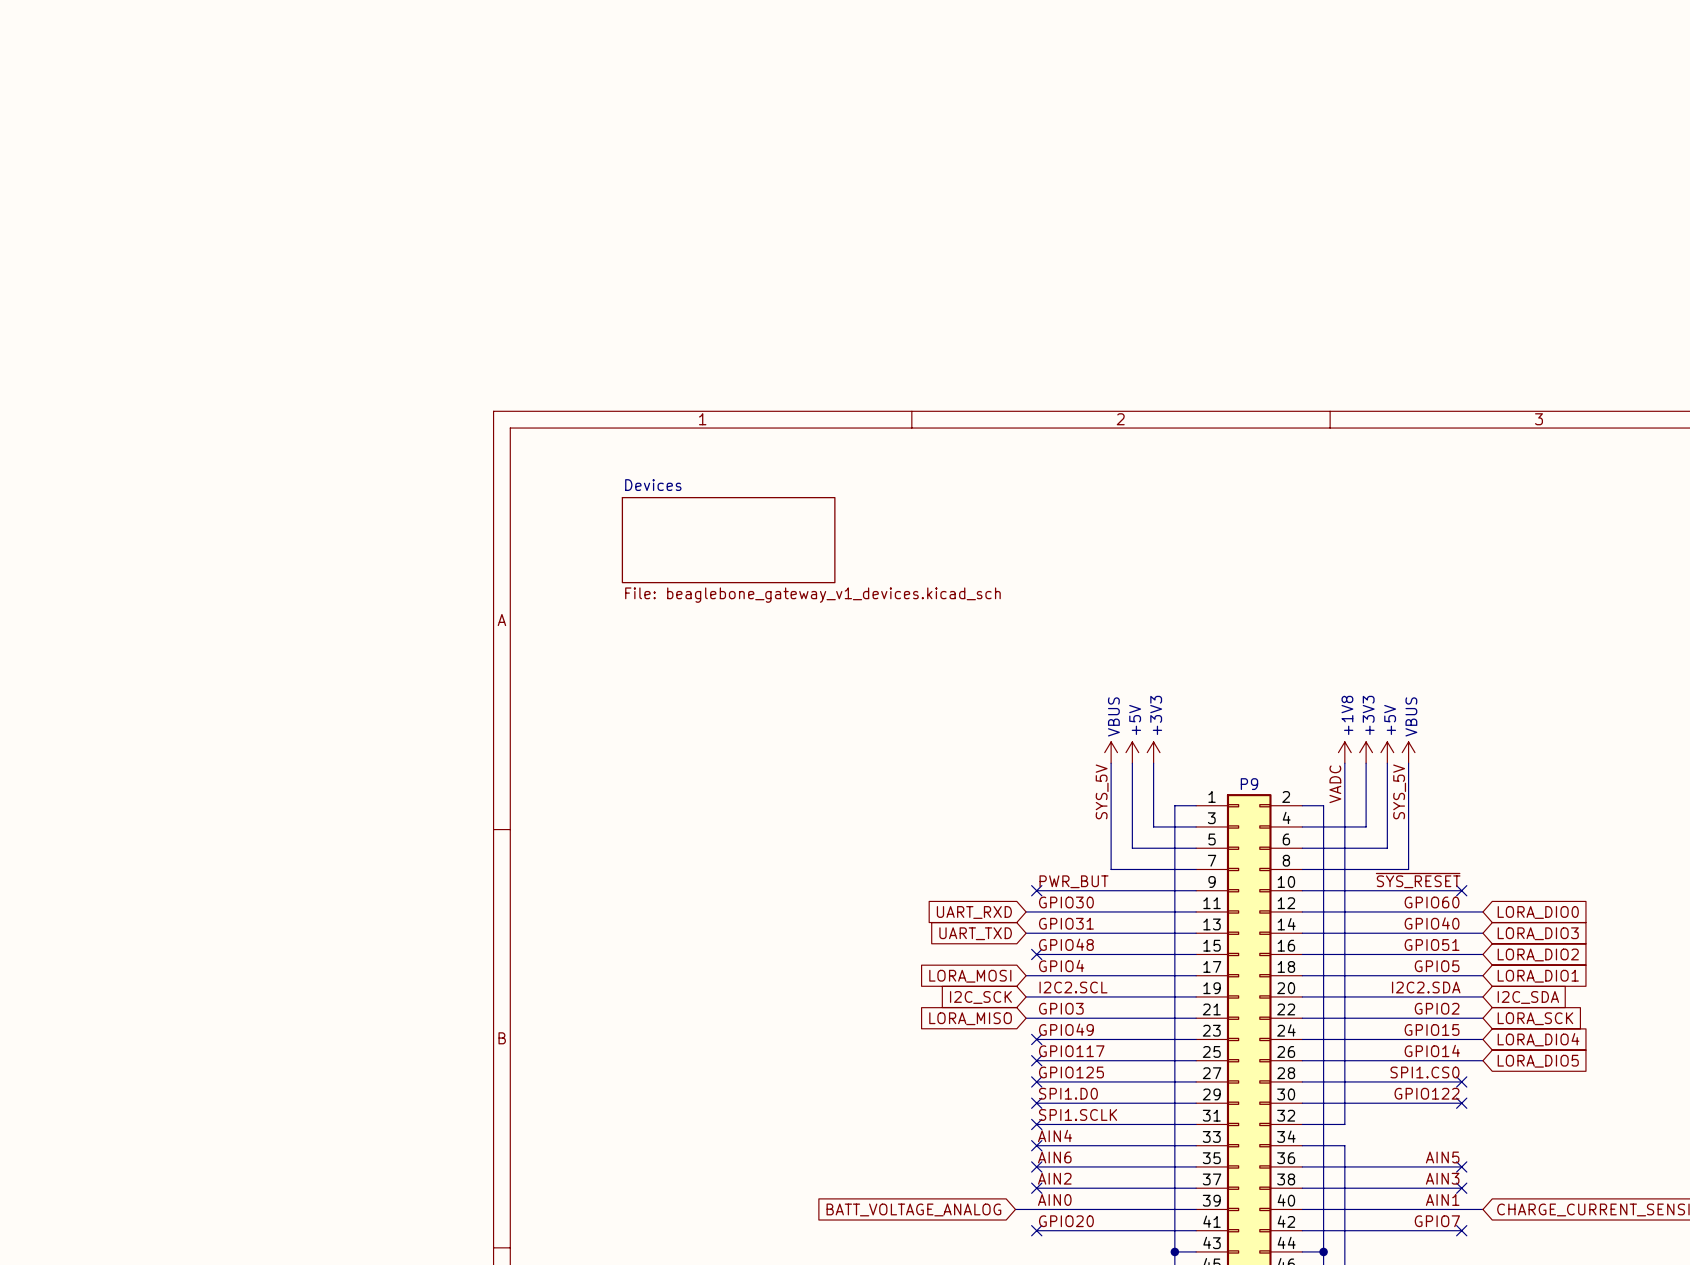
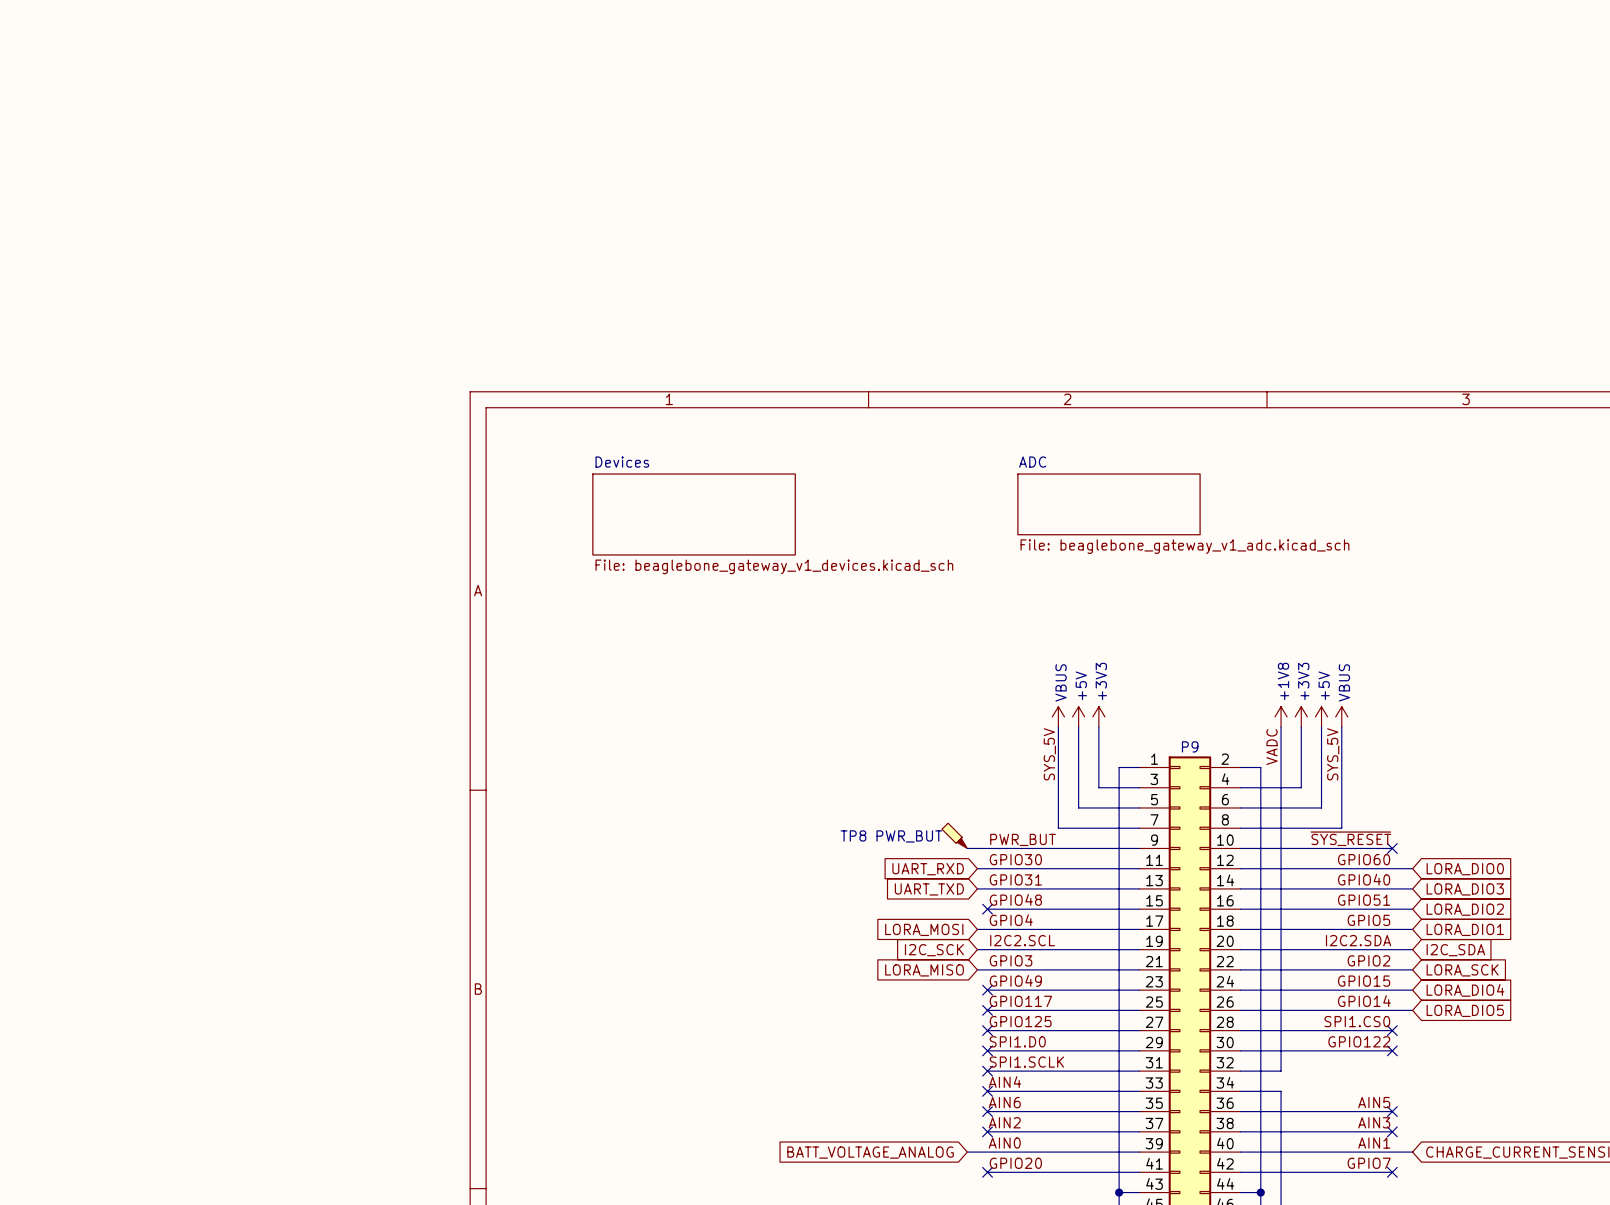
sheet ADC: none -> File: beaglebone_gateway_v1_adc.kicad_sch (1108, 504)
TP8: none -> PWR_BUT (954, 835)
wire: none -> (967, 848) (987, 848)
no-connect mark: (1036, 890) -> none

